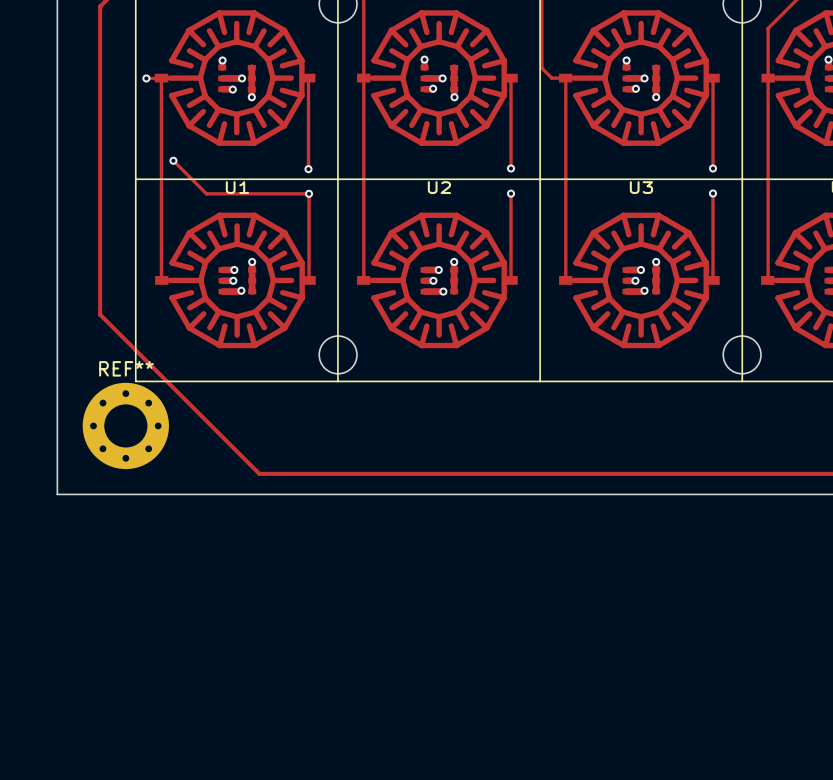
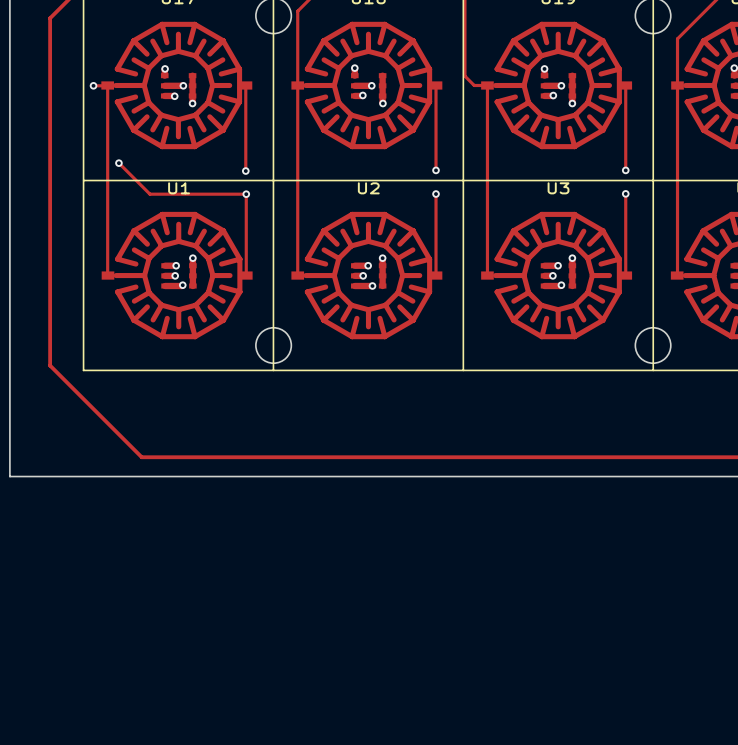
track: (100, 314) (259, 473) -> (50, 307) (50, 365) (141, 457) (199, 457)
REF**: (125, 425) -> none

